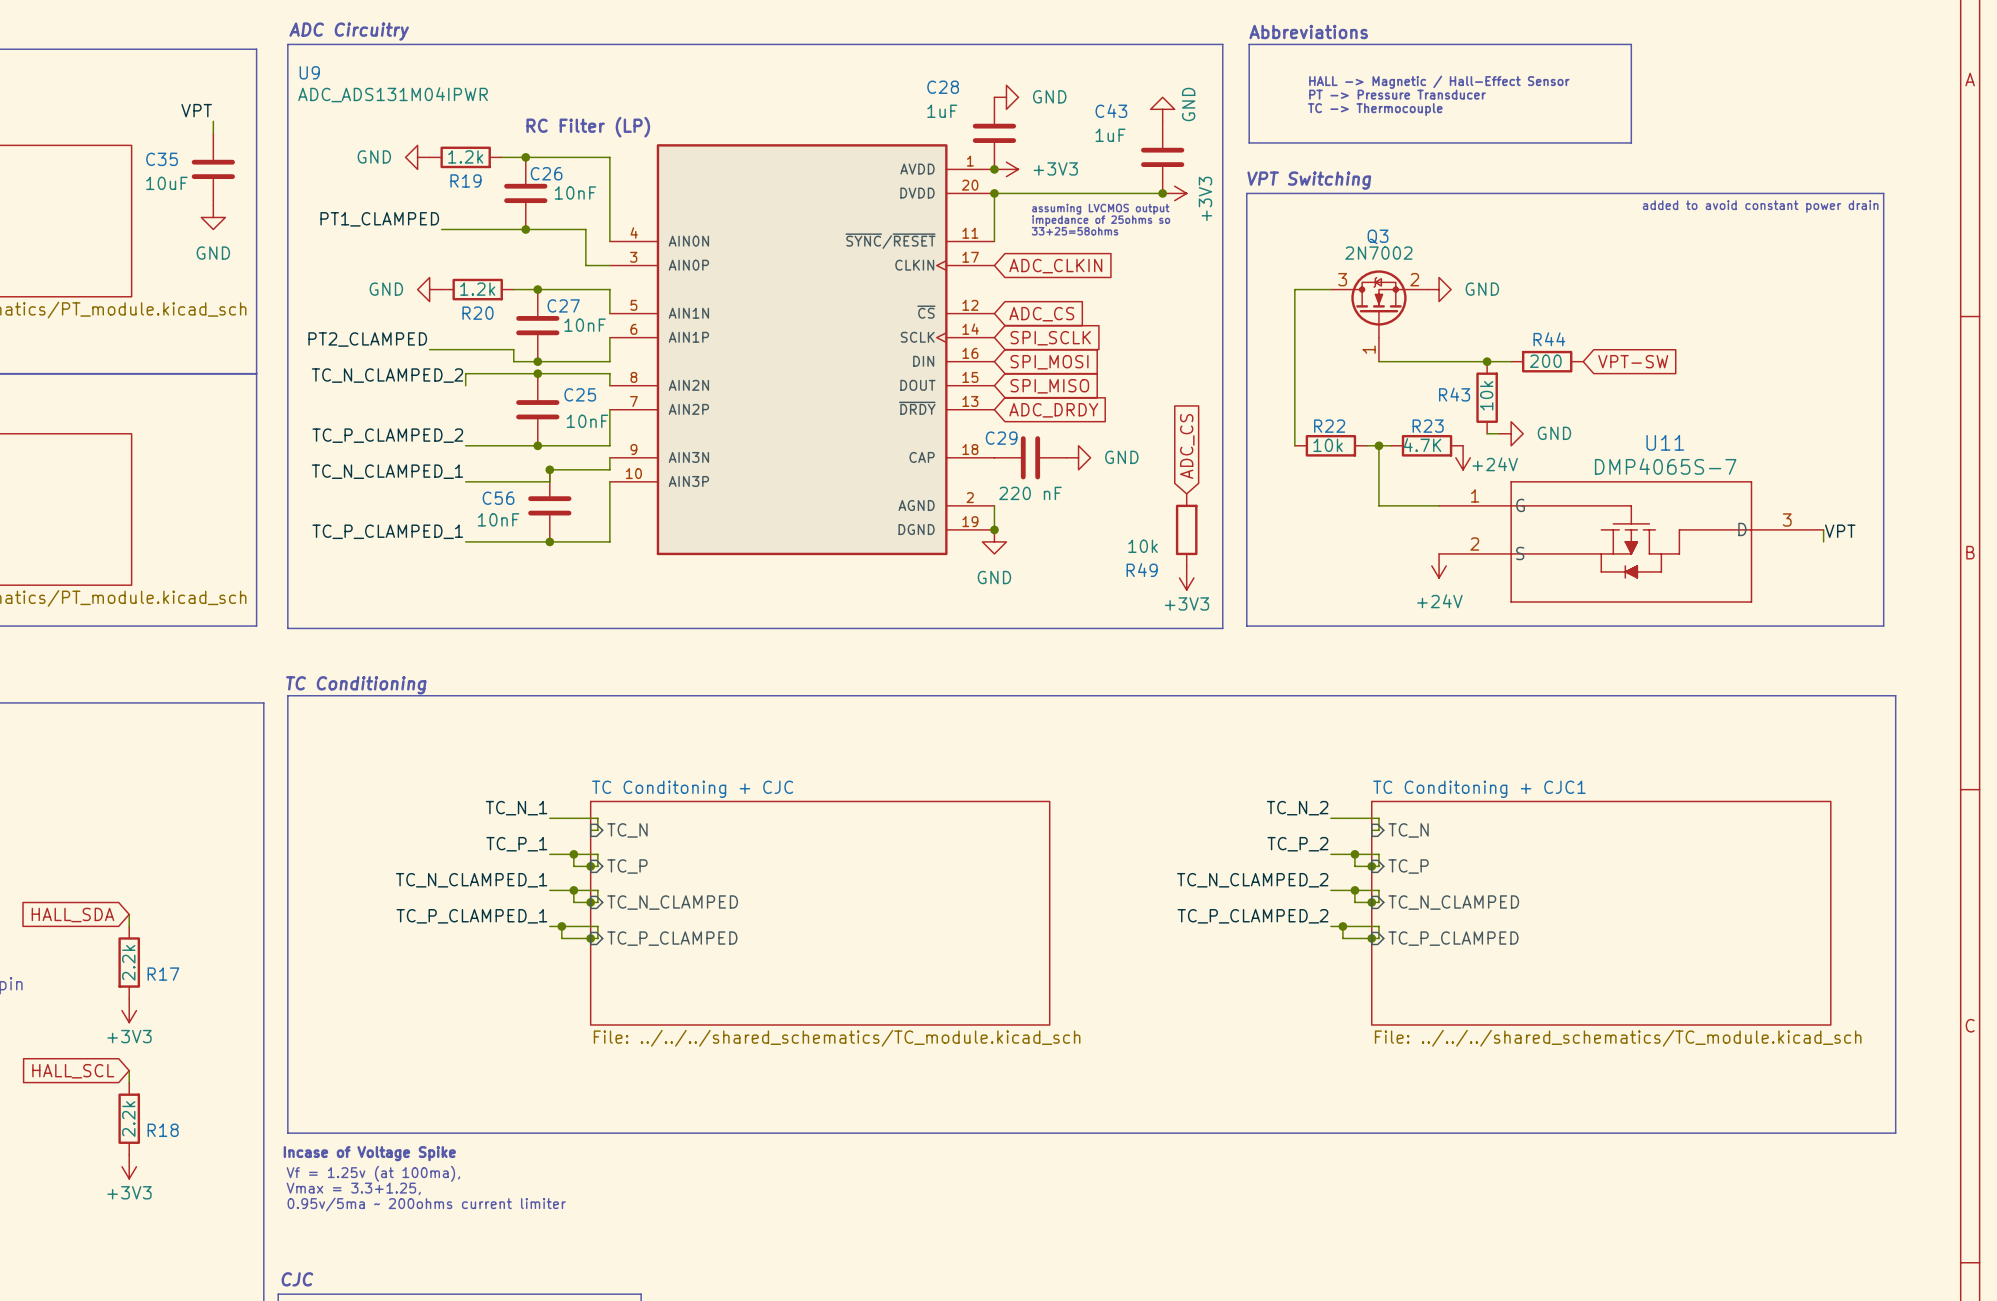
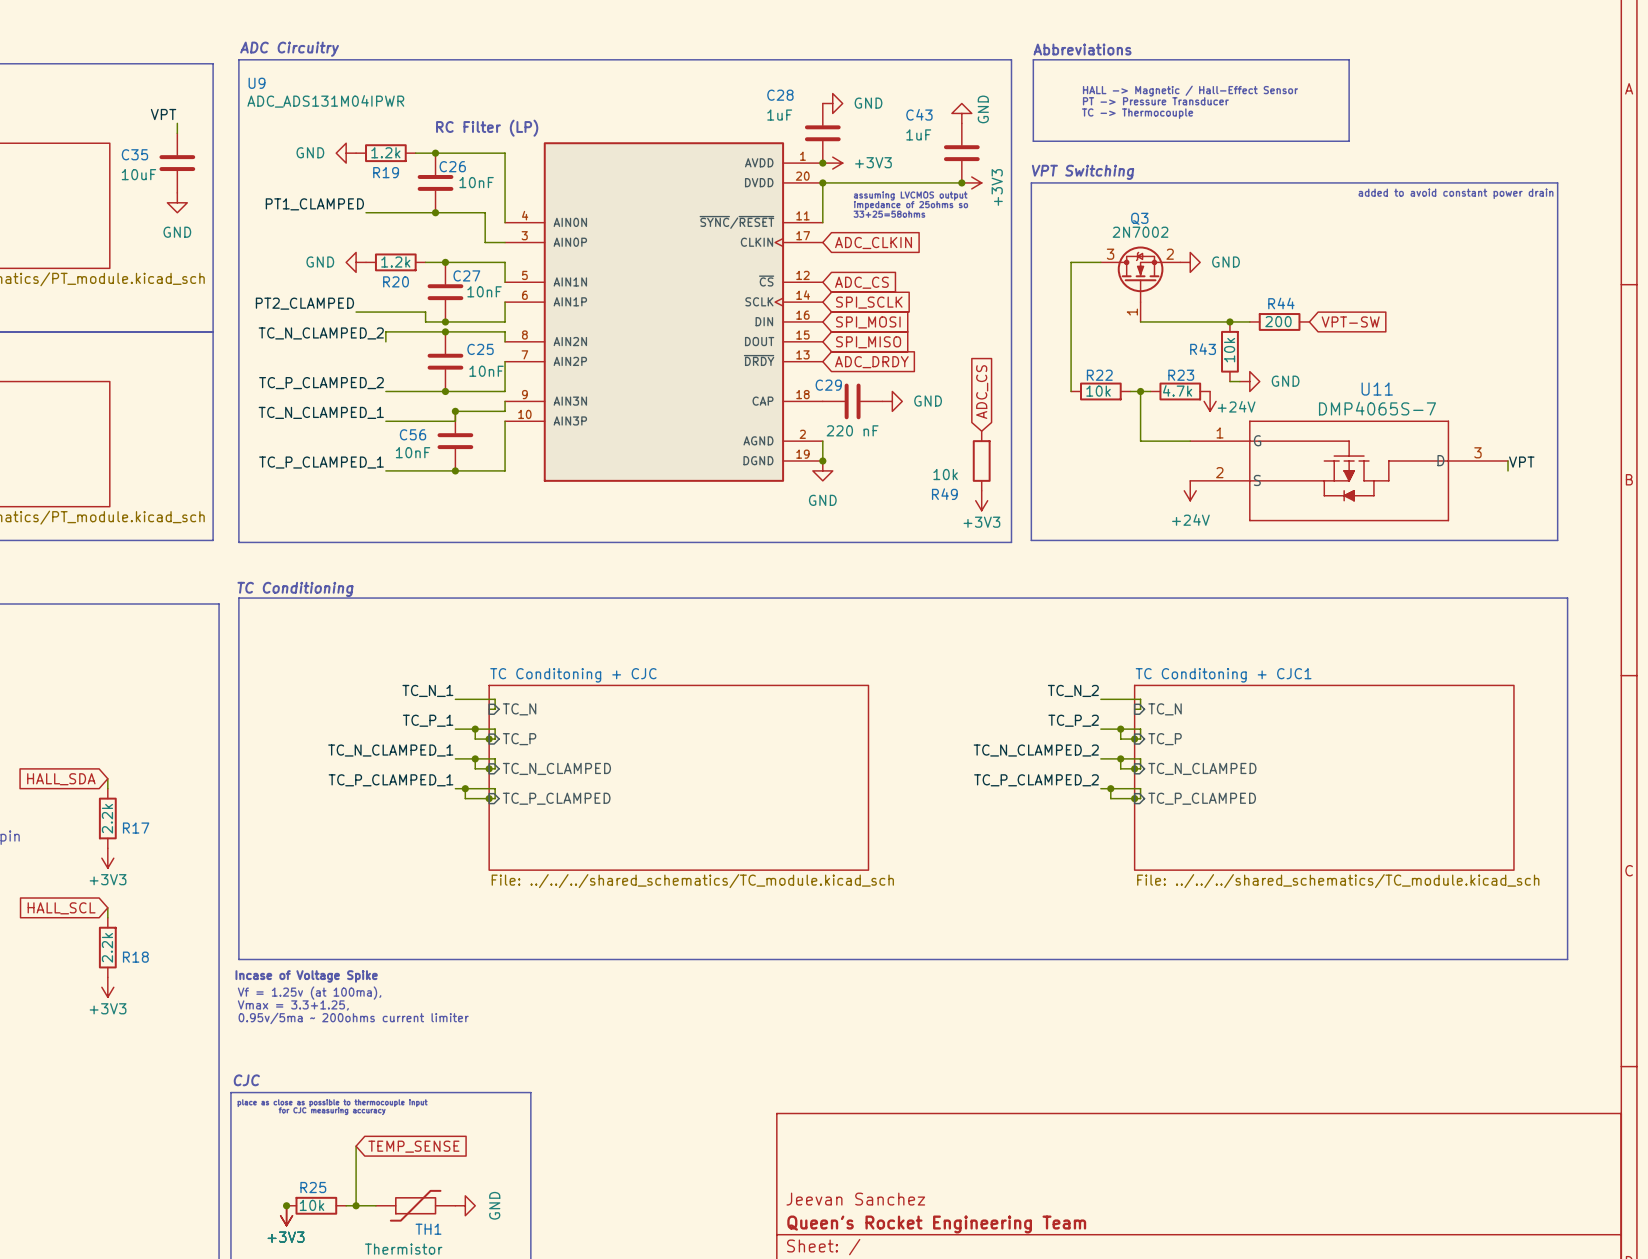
R23 value: 4.7K (1422, 445) -> 4.7k (1177, 390)

